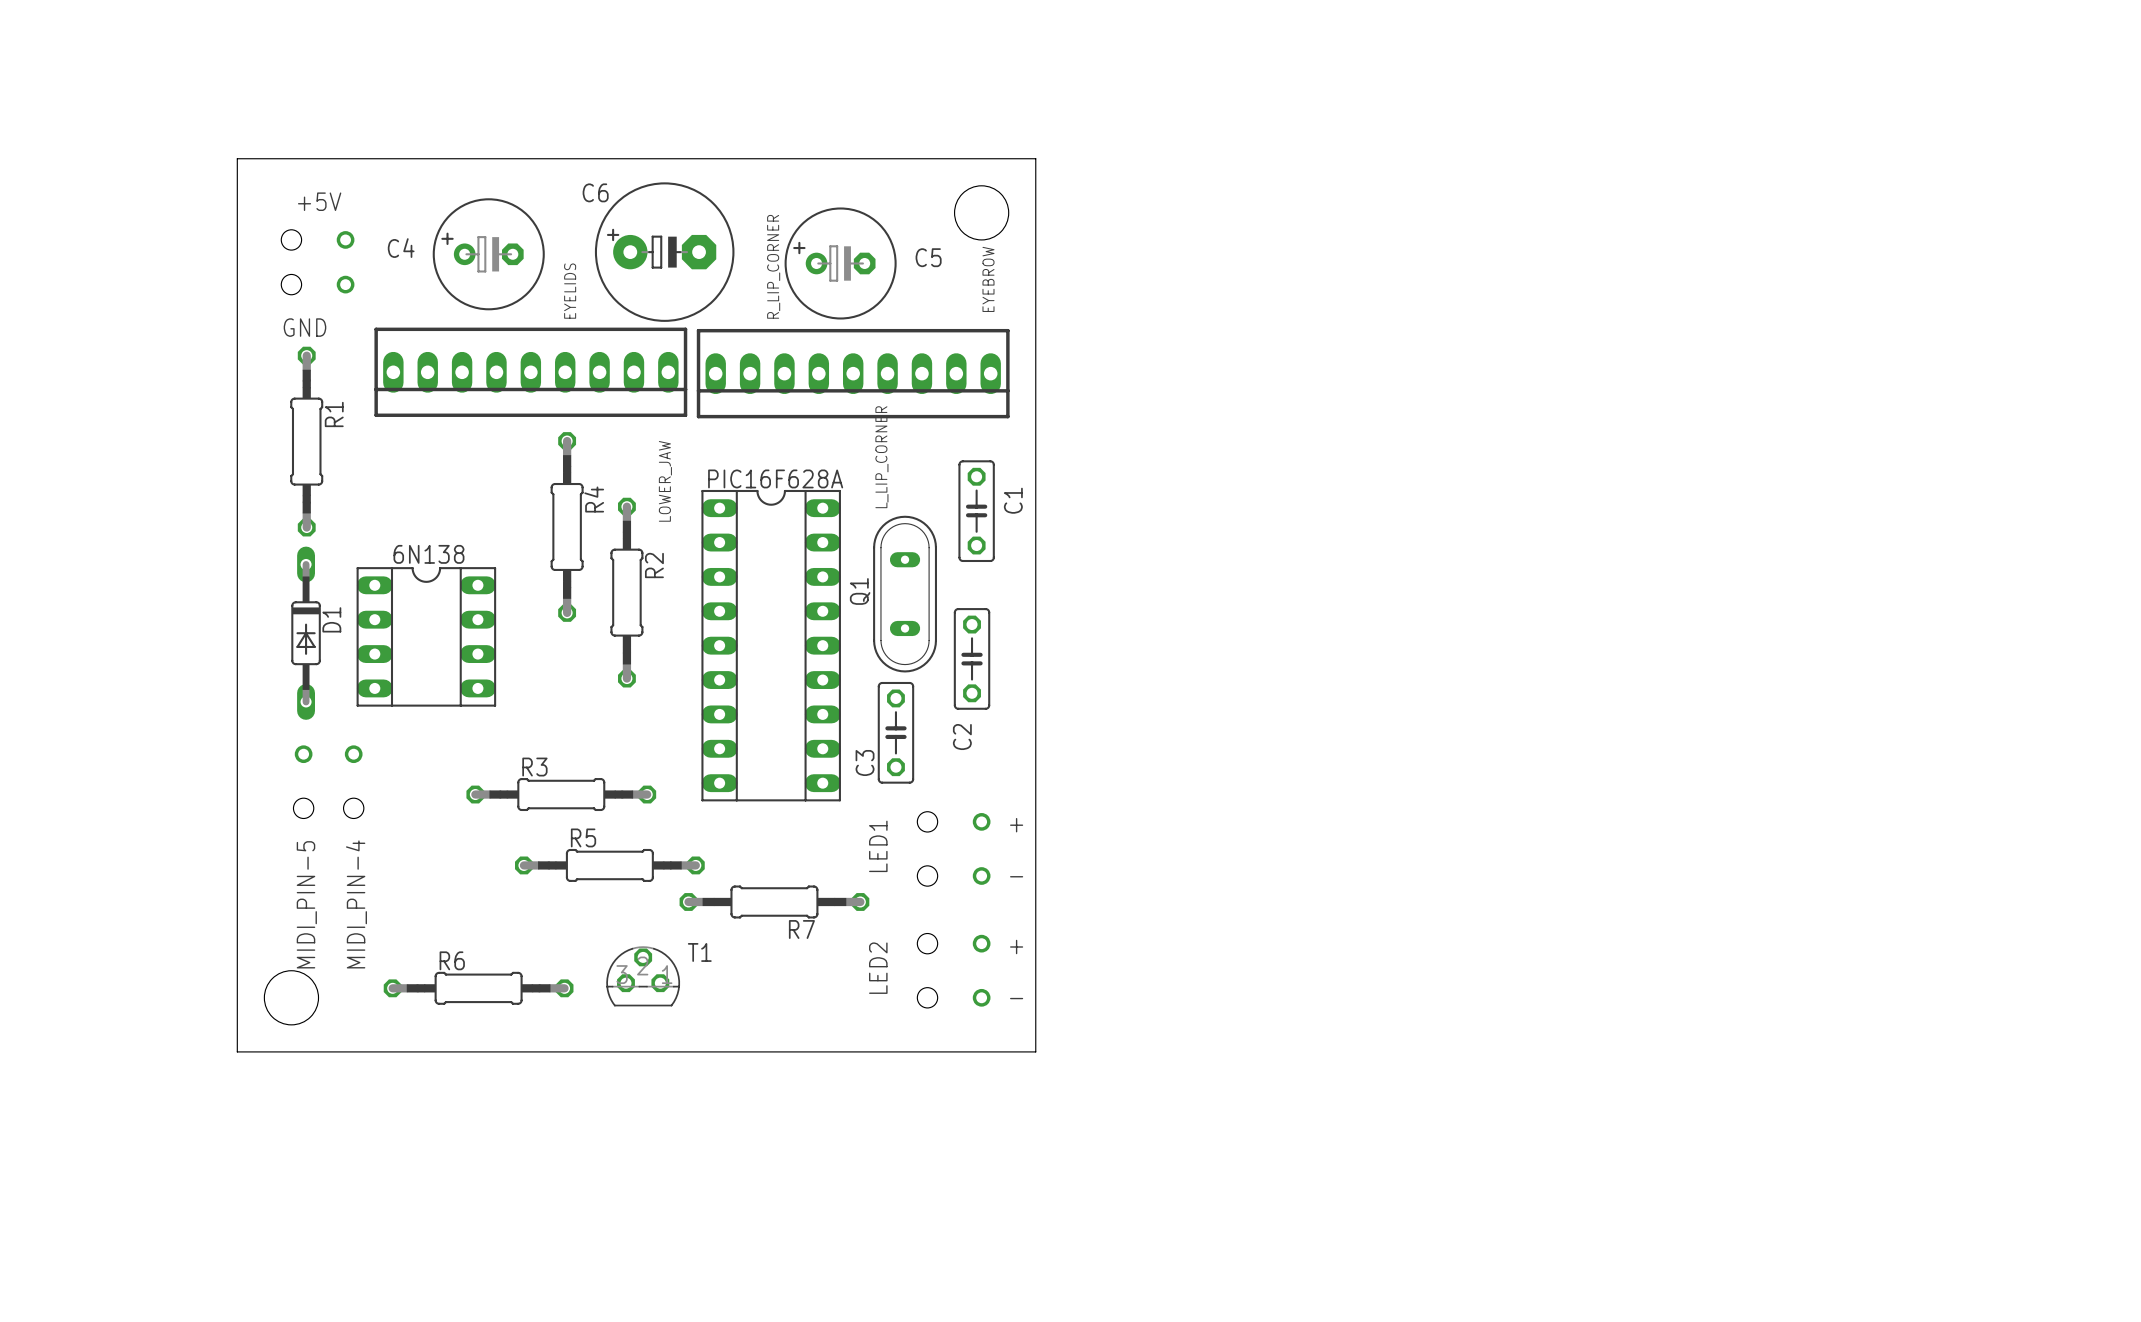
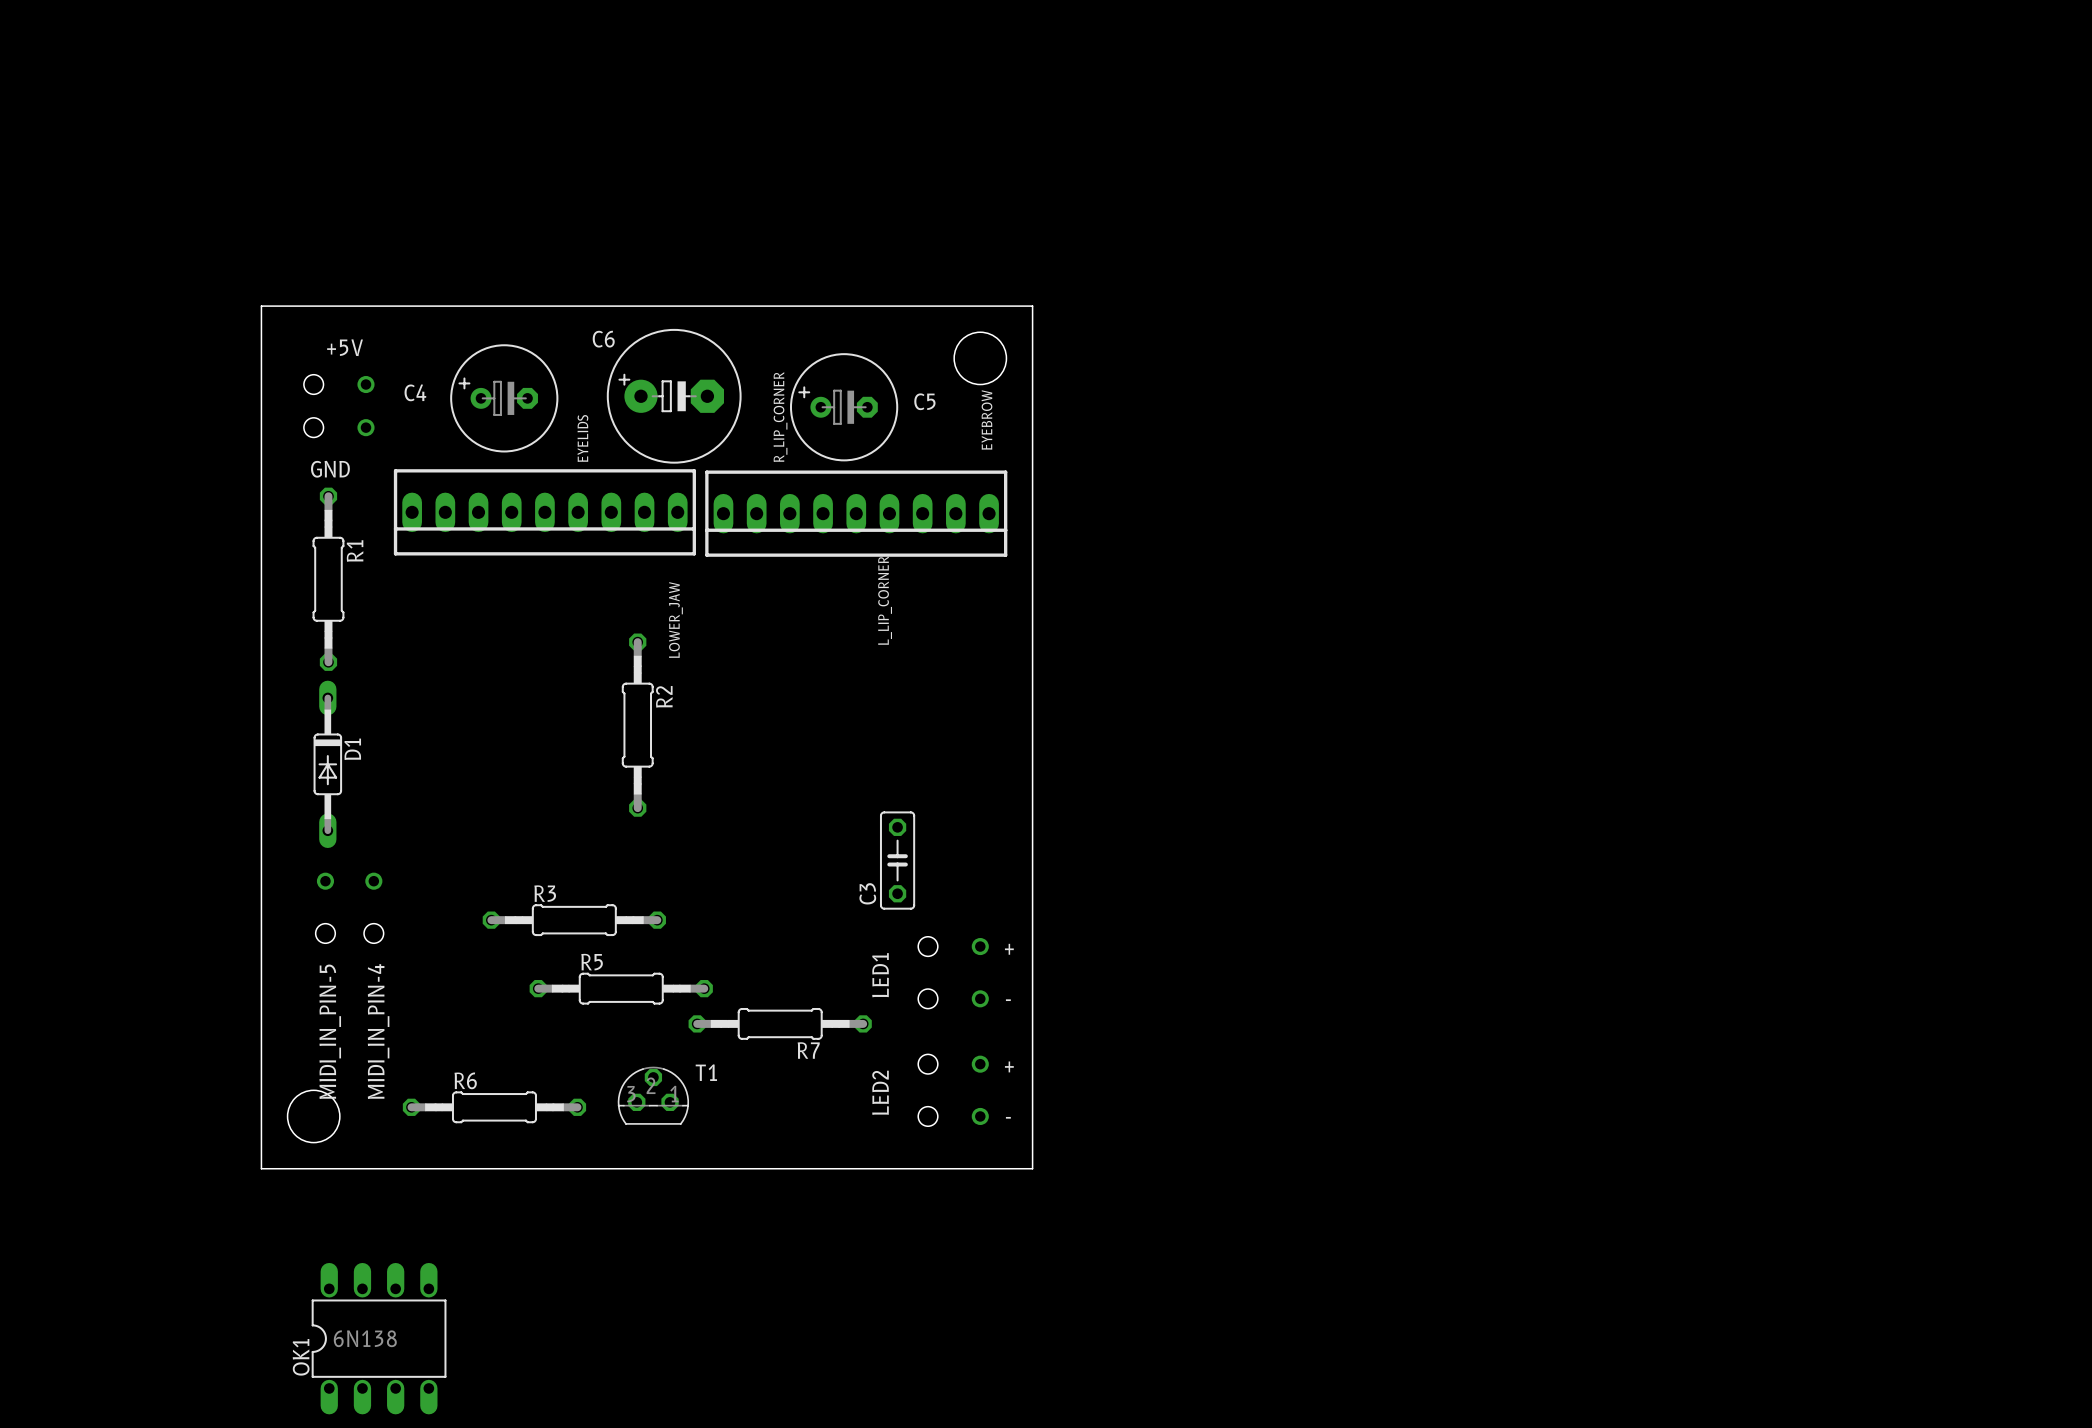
C1: (976, 511) -> none
R4: (567, 526) -> none
Q1: (905, 594) -> none
6N138: (426, 636) -> none
PIC16F628A: (771, 645) -> none
C2: (972, 658) -> none
MIDI_PIN-5 name: MIDI_PIN-5 (306, 904) -> MIDI_IN_PIN-5 (330, 1031)
MIDI_PIN-4 name: MIDI_PIN-4 (356, 904) -> MIDI_IN_PIN-4 (378, 1031)
OK1: none -> 6N138 (379, 1338)

